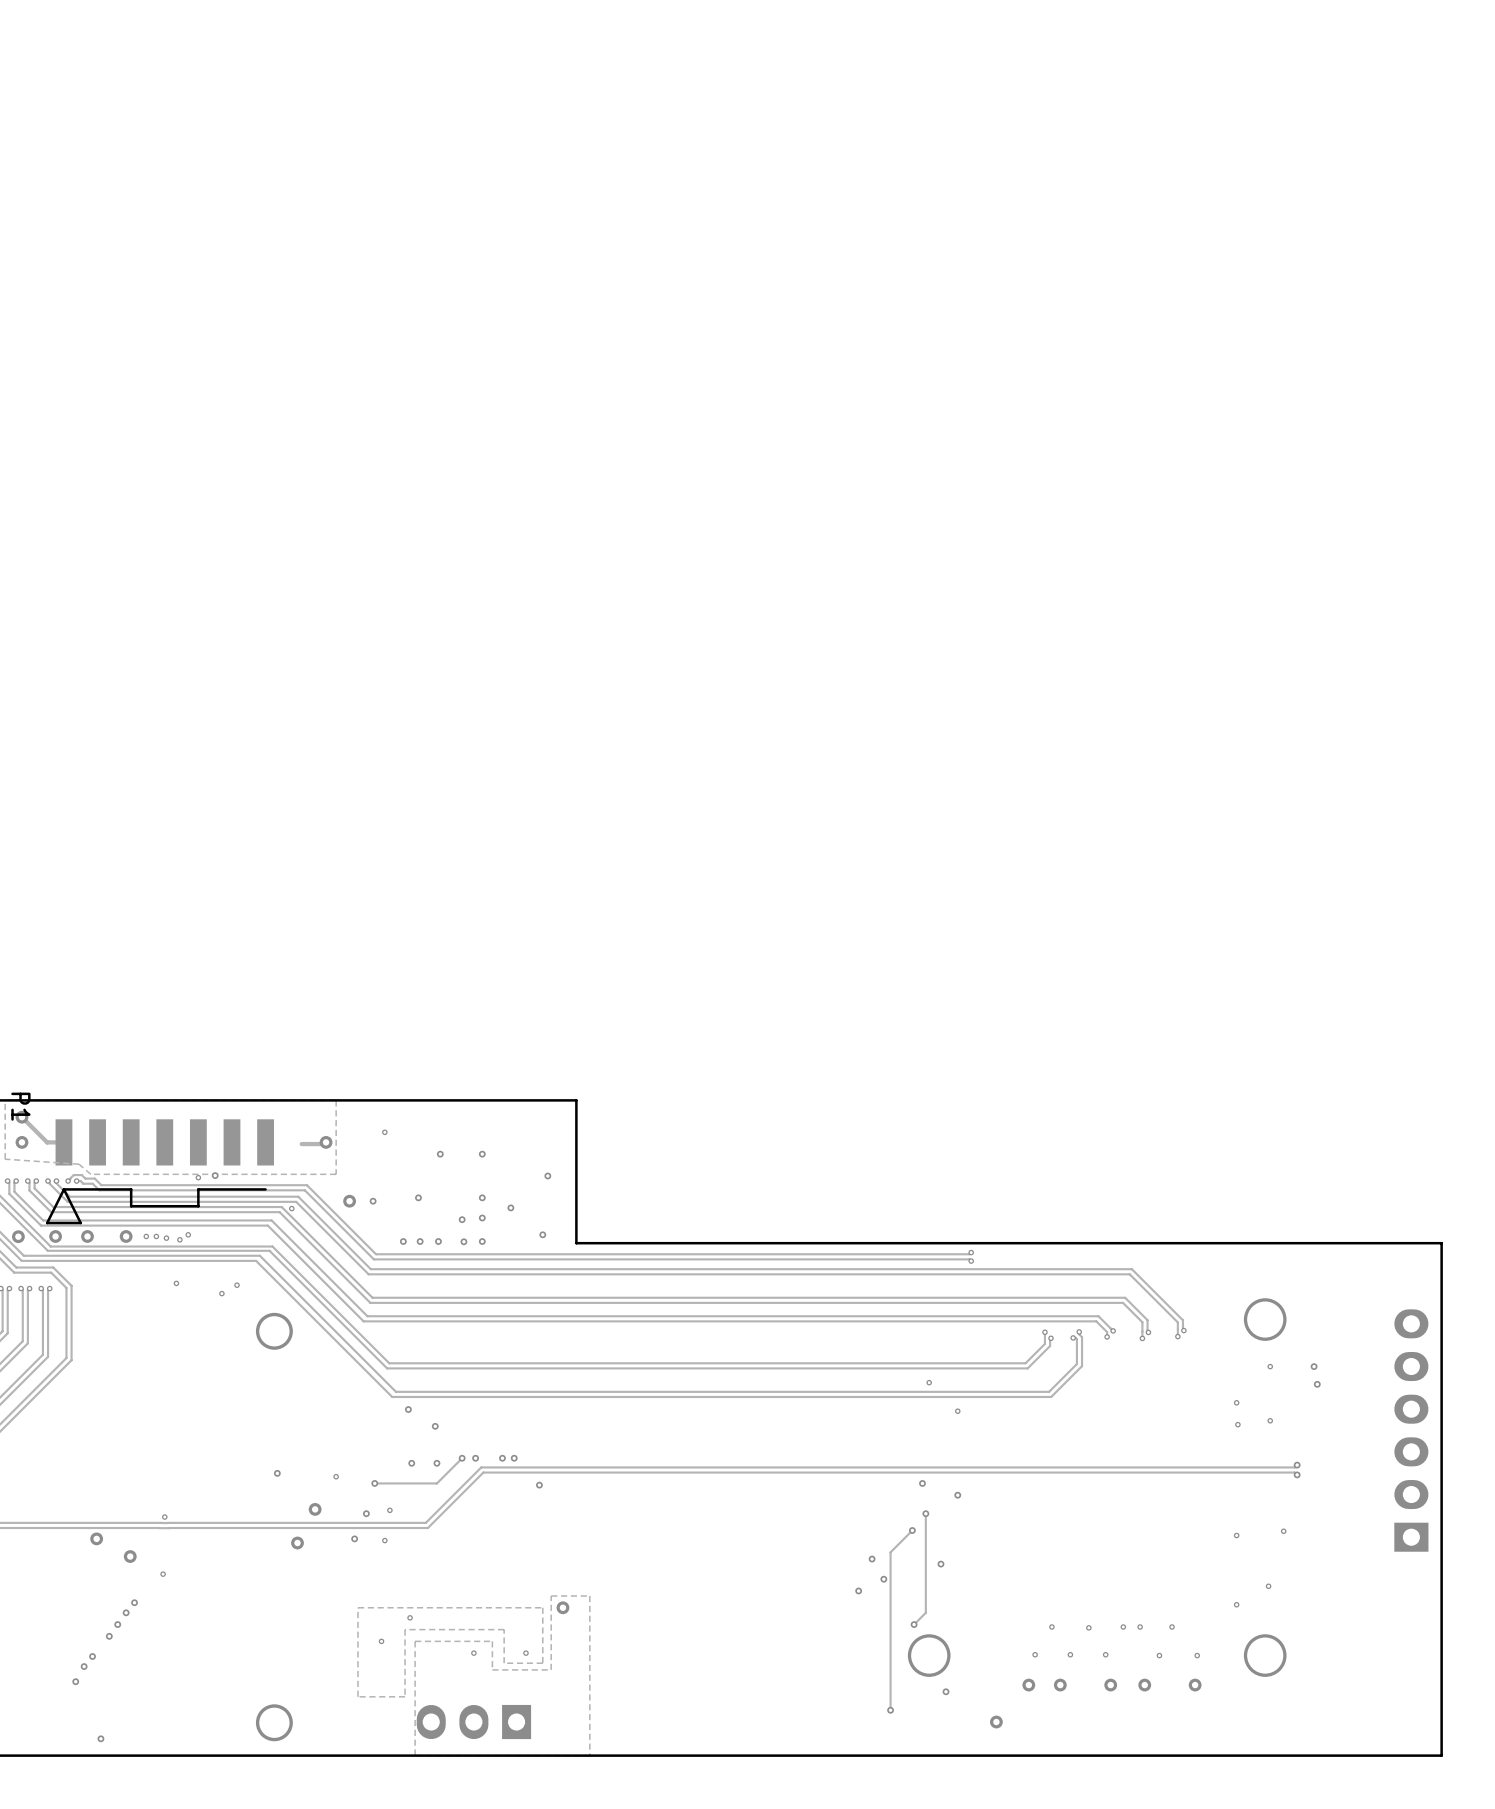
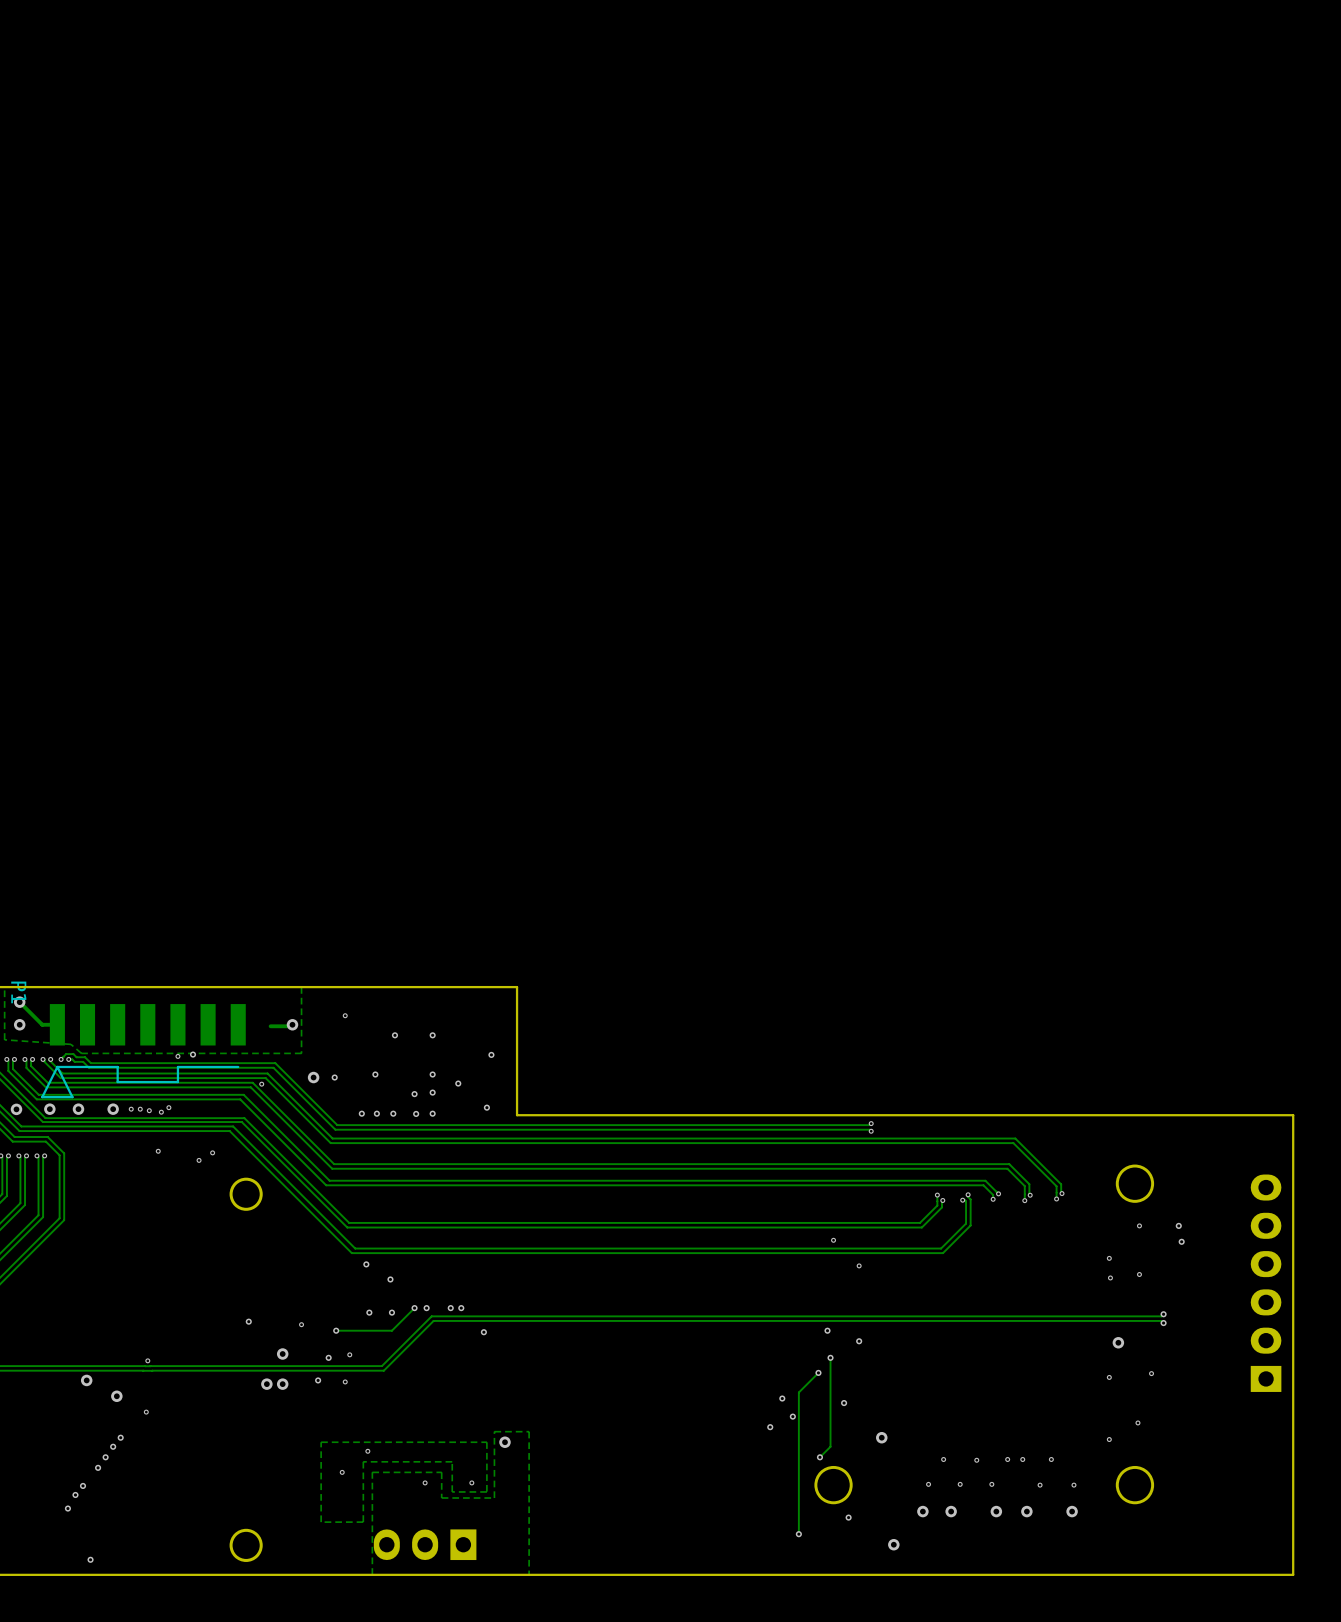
via: none -> (1118, 1342)
via: none -> (282, 1384)
via: none -> (881, 1437)

